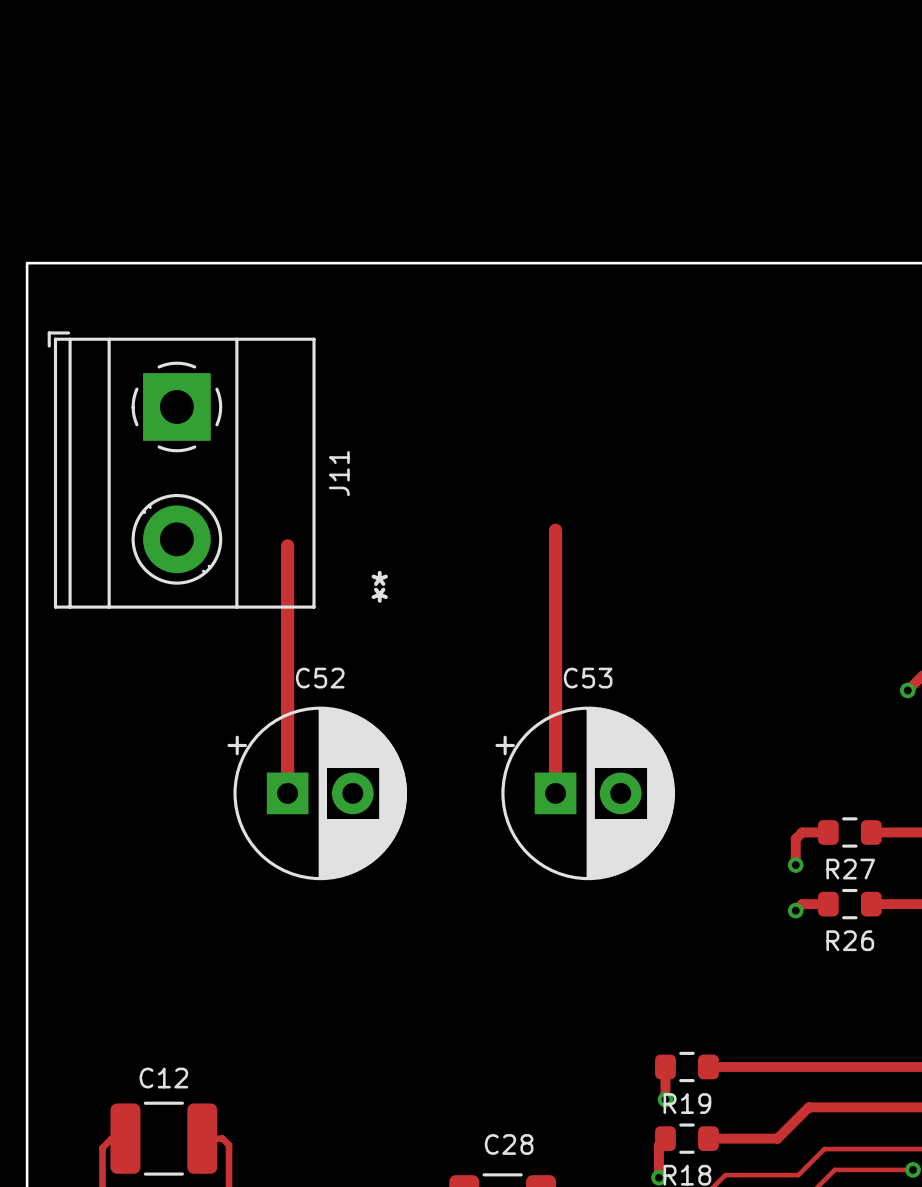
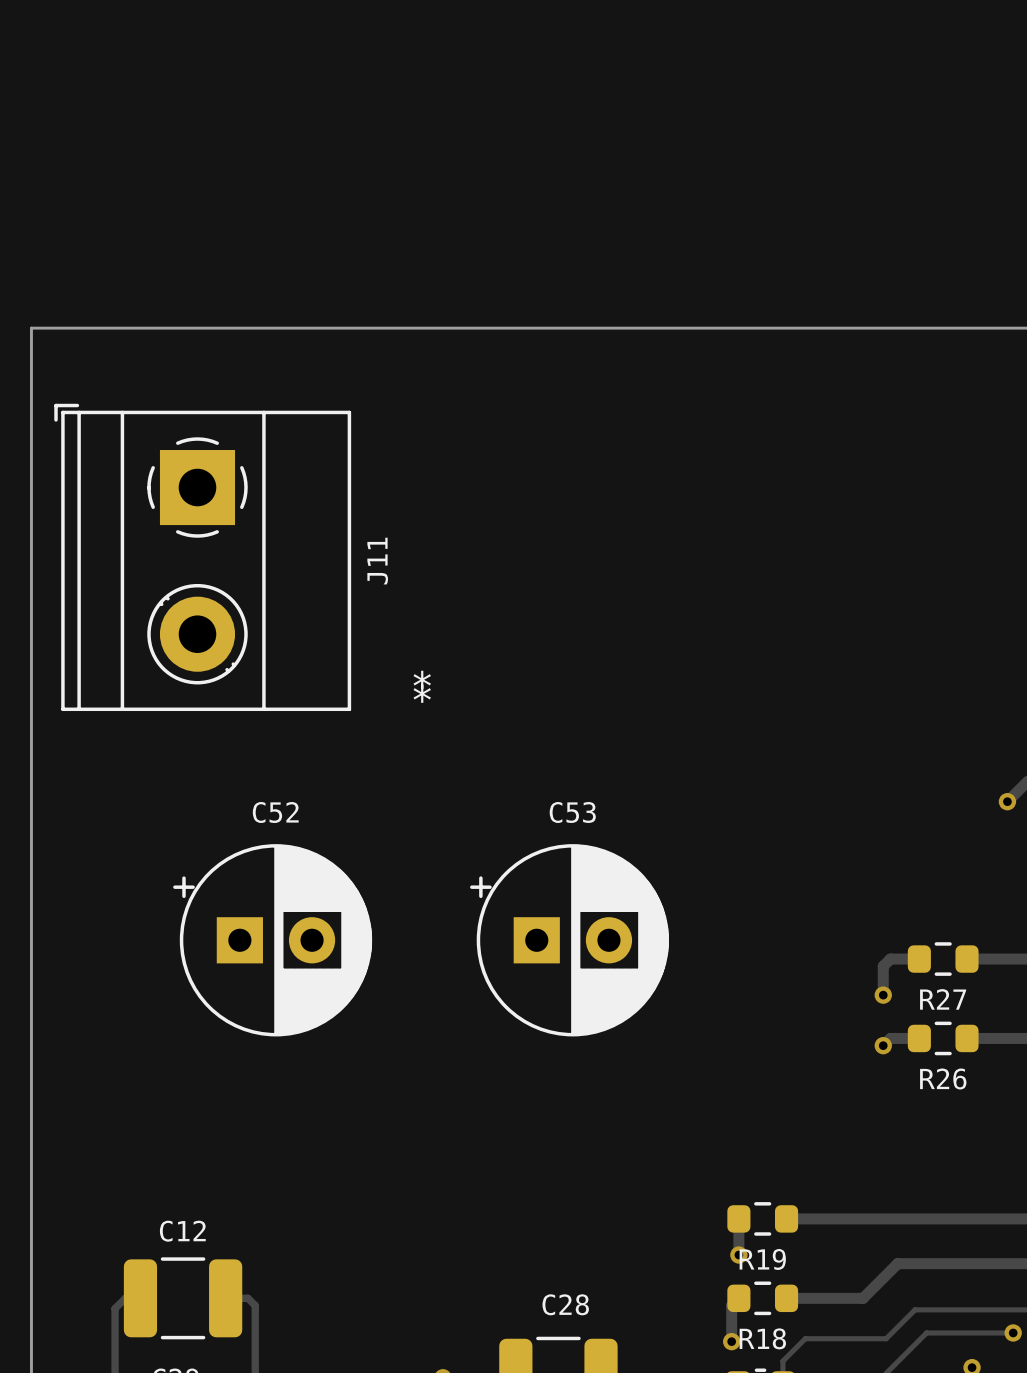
track: (555, 530) (555, 793) -> none
track: (287, 545) (287, 793) -> none
C52 position: (317, 793) -> (272, 940)
C53 position: (585, 793) -> (569, 940)

